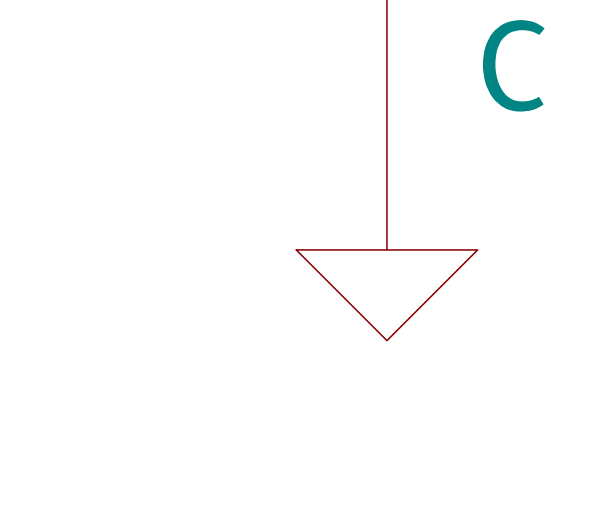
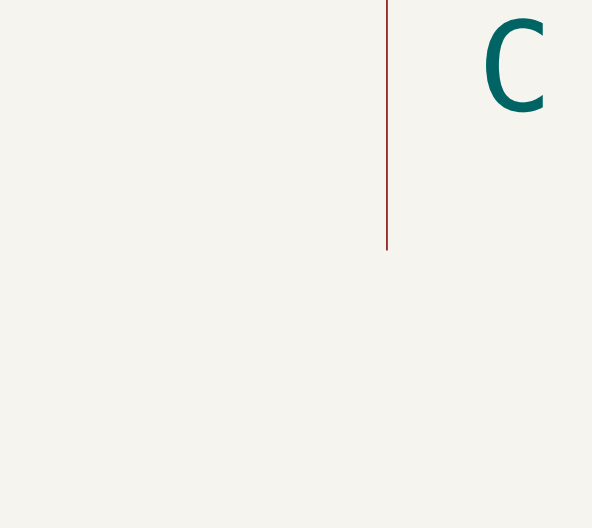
power symbol: (386, 295) -> none

